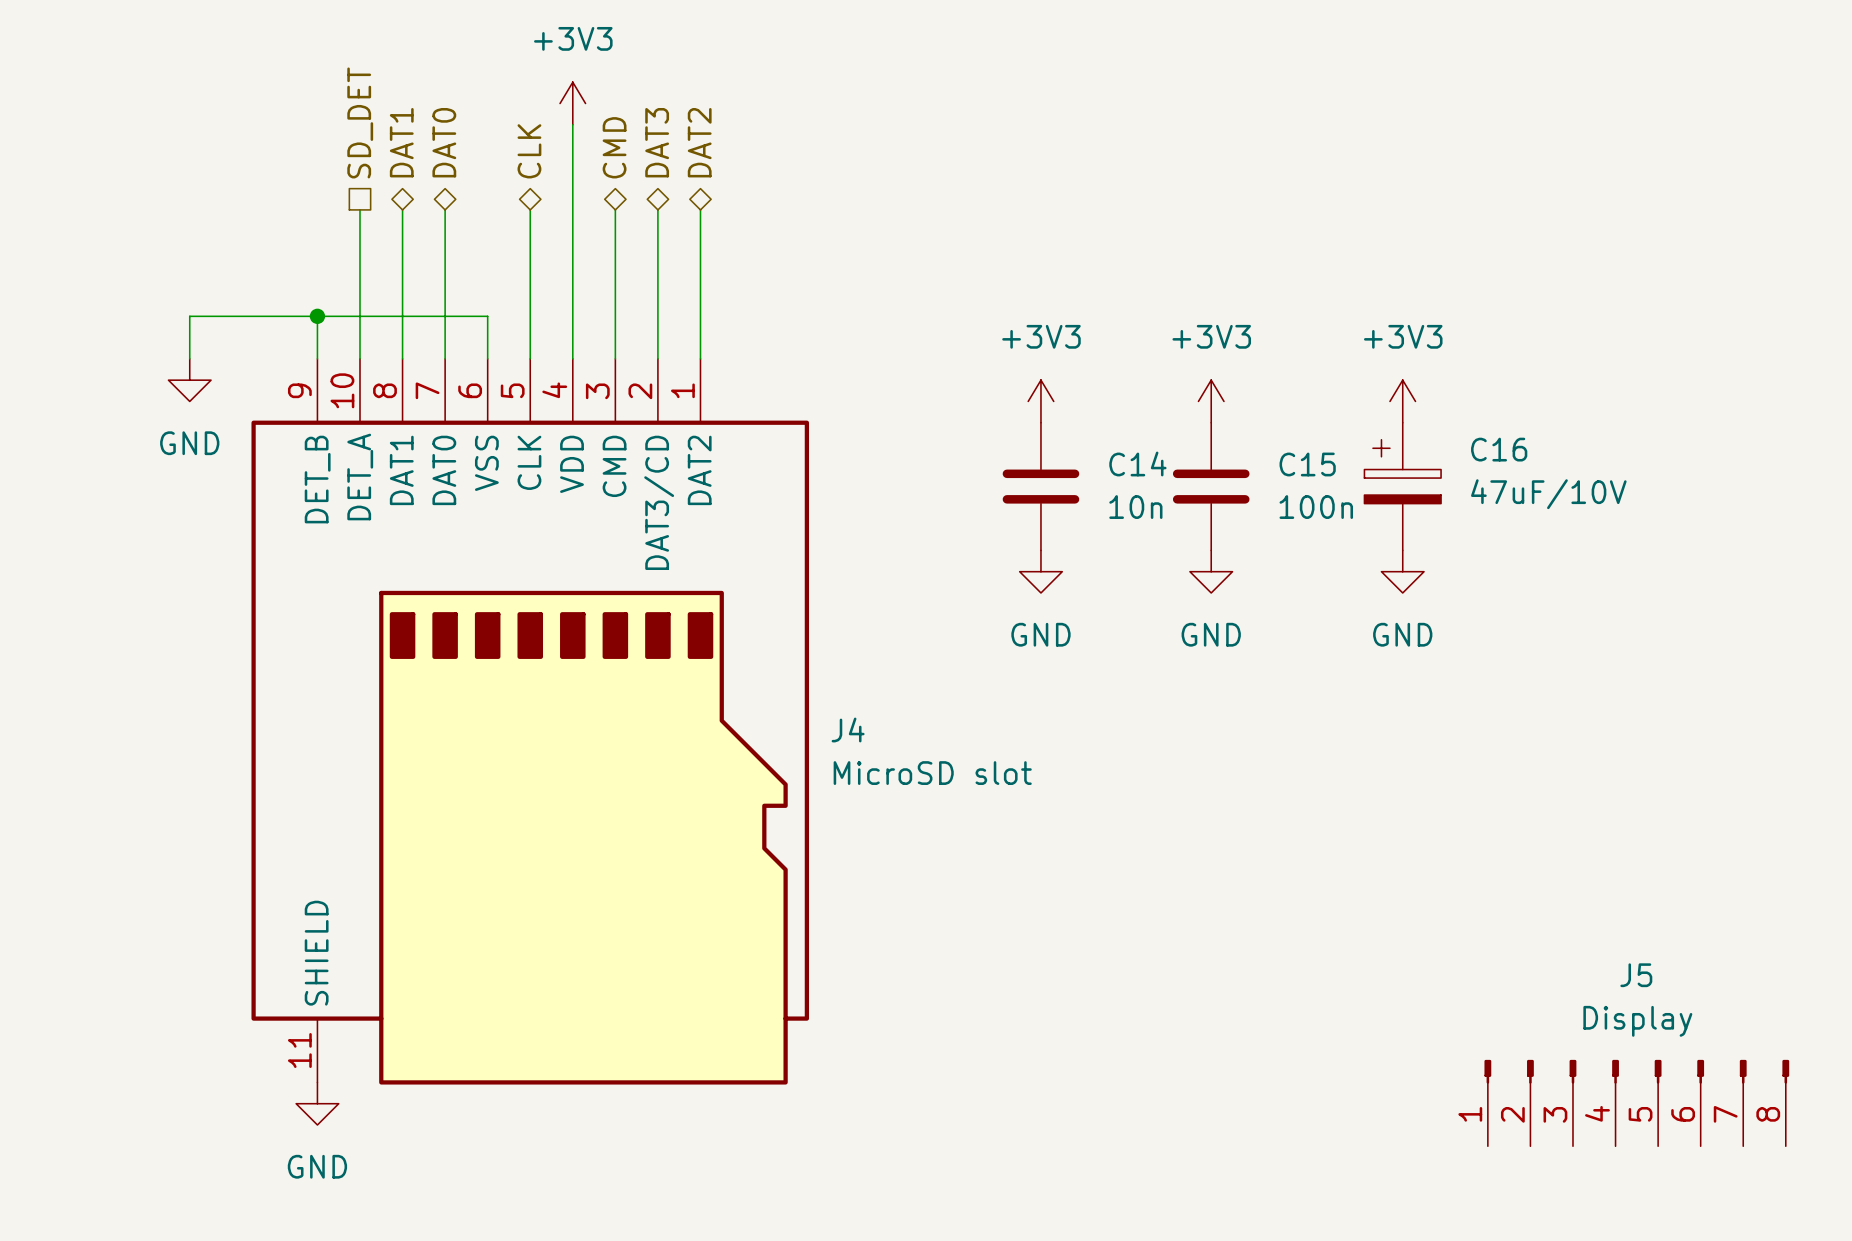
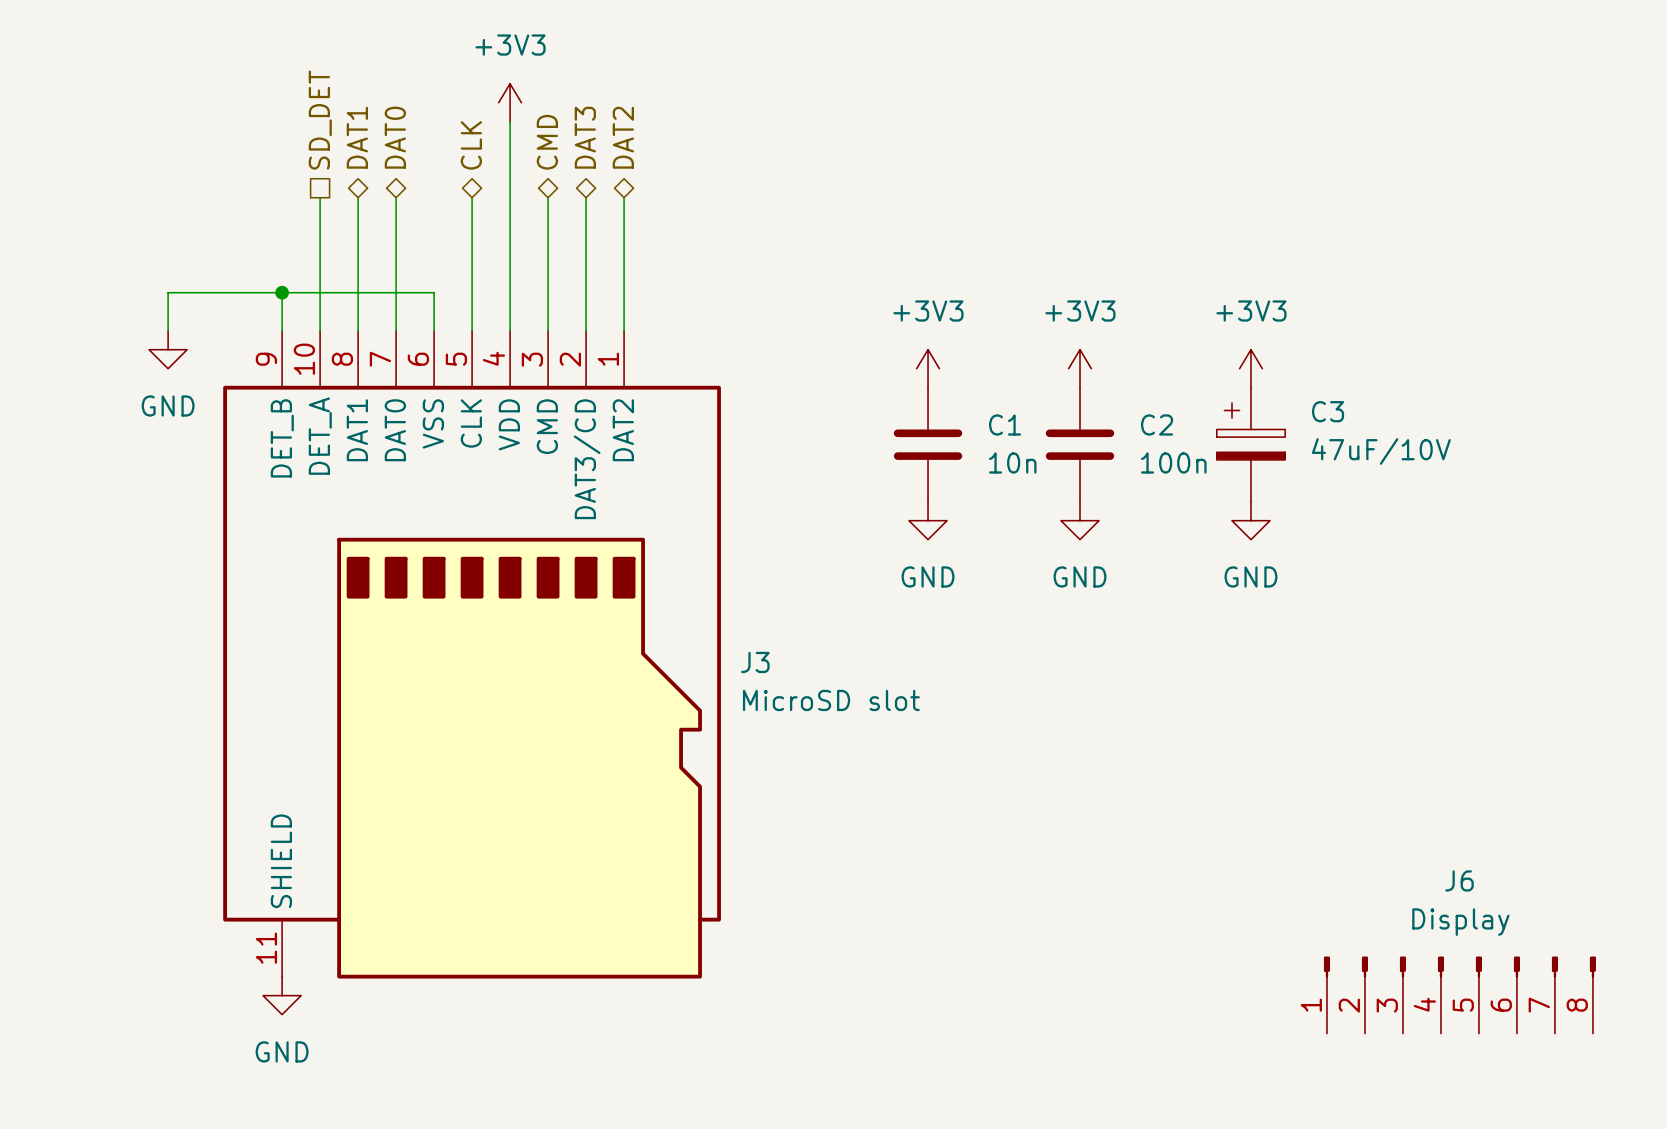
C16 name: C16 (1499, 449) -> C3 (1328, 411)
C14 name: C14 (1137, 463) -> C1 (1005, 424)
C15 name: C15 (1307, 464) -> C2 (1157, 424)
J4 name: J4 (848, 729) -> J3 (755, 662)
J5 name: J5 (1636, 975) -> J6 (1459, 880)

